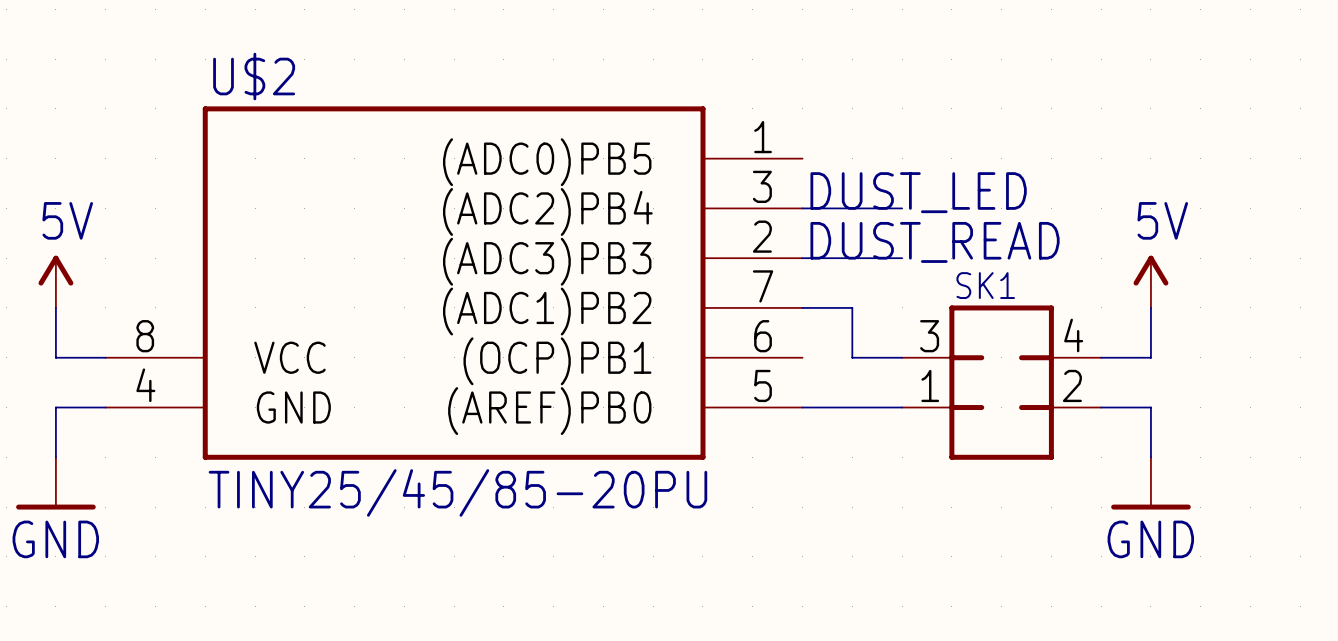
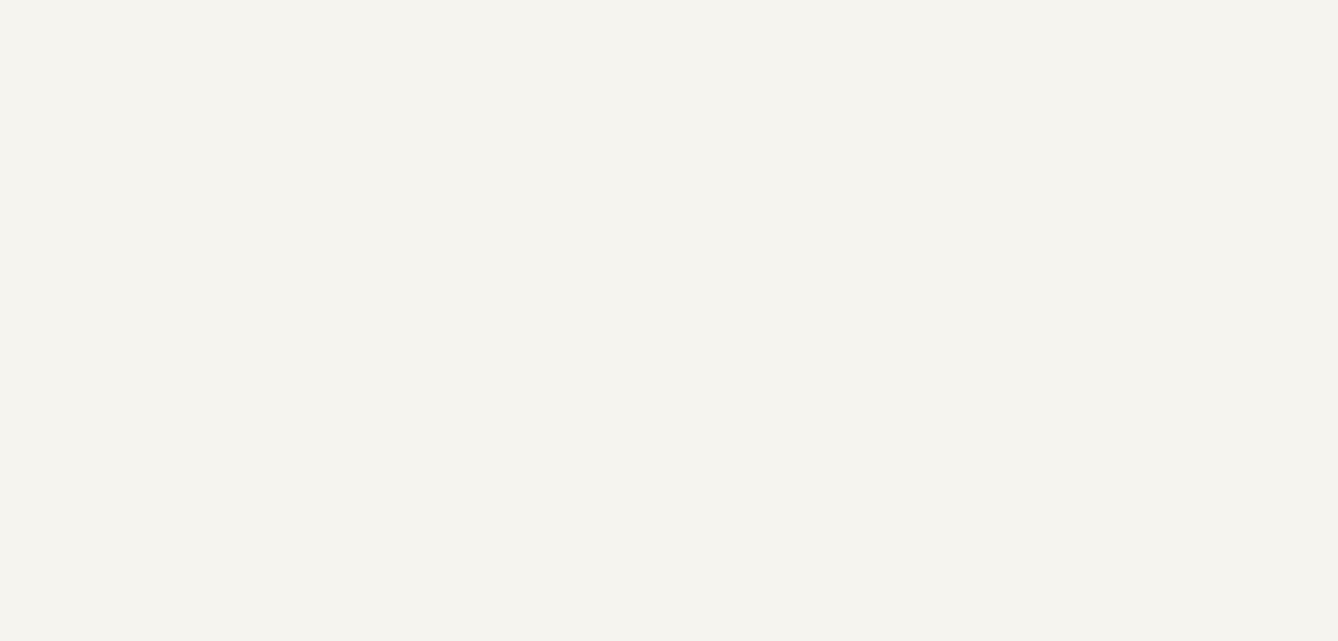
text: DUST_LED (918, 192) -> none
wire: (802, 208) (902, 208) -> none
text: DUST_READ (935, 242) -> none
wire: (802, 258) (902, 258) -> none
power symbol: 5V (55, 281) -> none
power symbol: 5V (1150, 281) -> none
U$2: TINY25/45/85-20PU (454, 283) -> none
wire: (55, 307) (55, 357) (105, 357) -> none
wire: (802, 307) (852, 307) (852, 357) (902, 357) -> none
wire: (1150, 307) (1150, 357) (1101, 357) -> none
SK1: (1001, 382) -> none
wire: (105, 407) (55, 407) (55, 457) -> none
wire: (802, 407) (902, 407) -> none
wire: (1101, 407) (1150, 407) (1150, 457) -> none
power symbol: GND (55, 483) -> none
power symbol: GND (1150, 483) -> none

